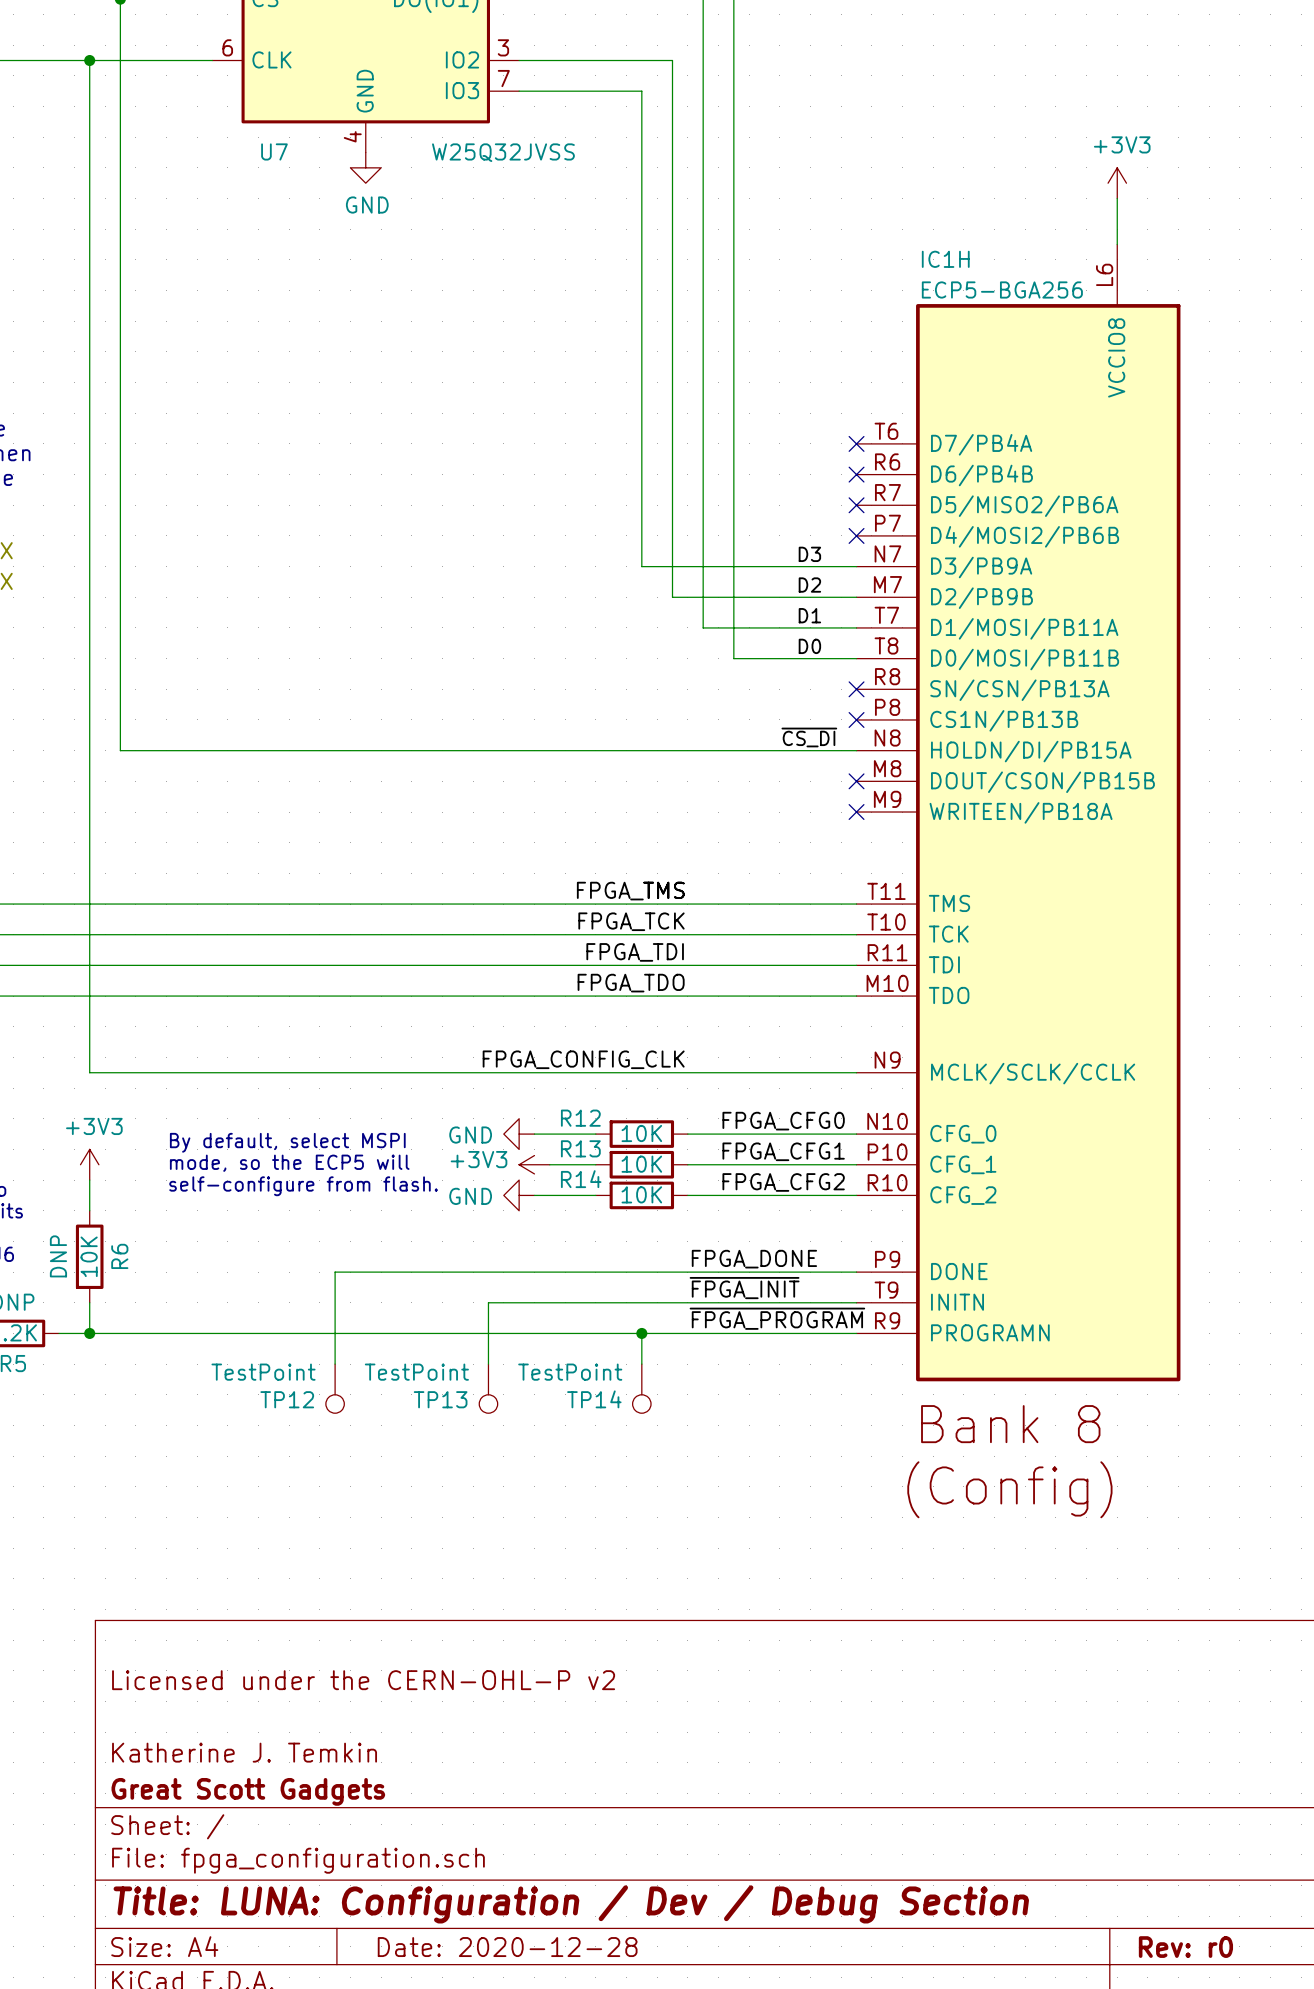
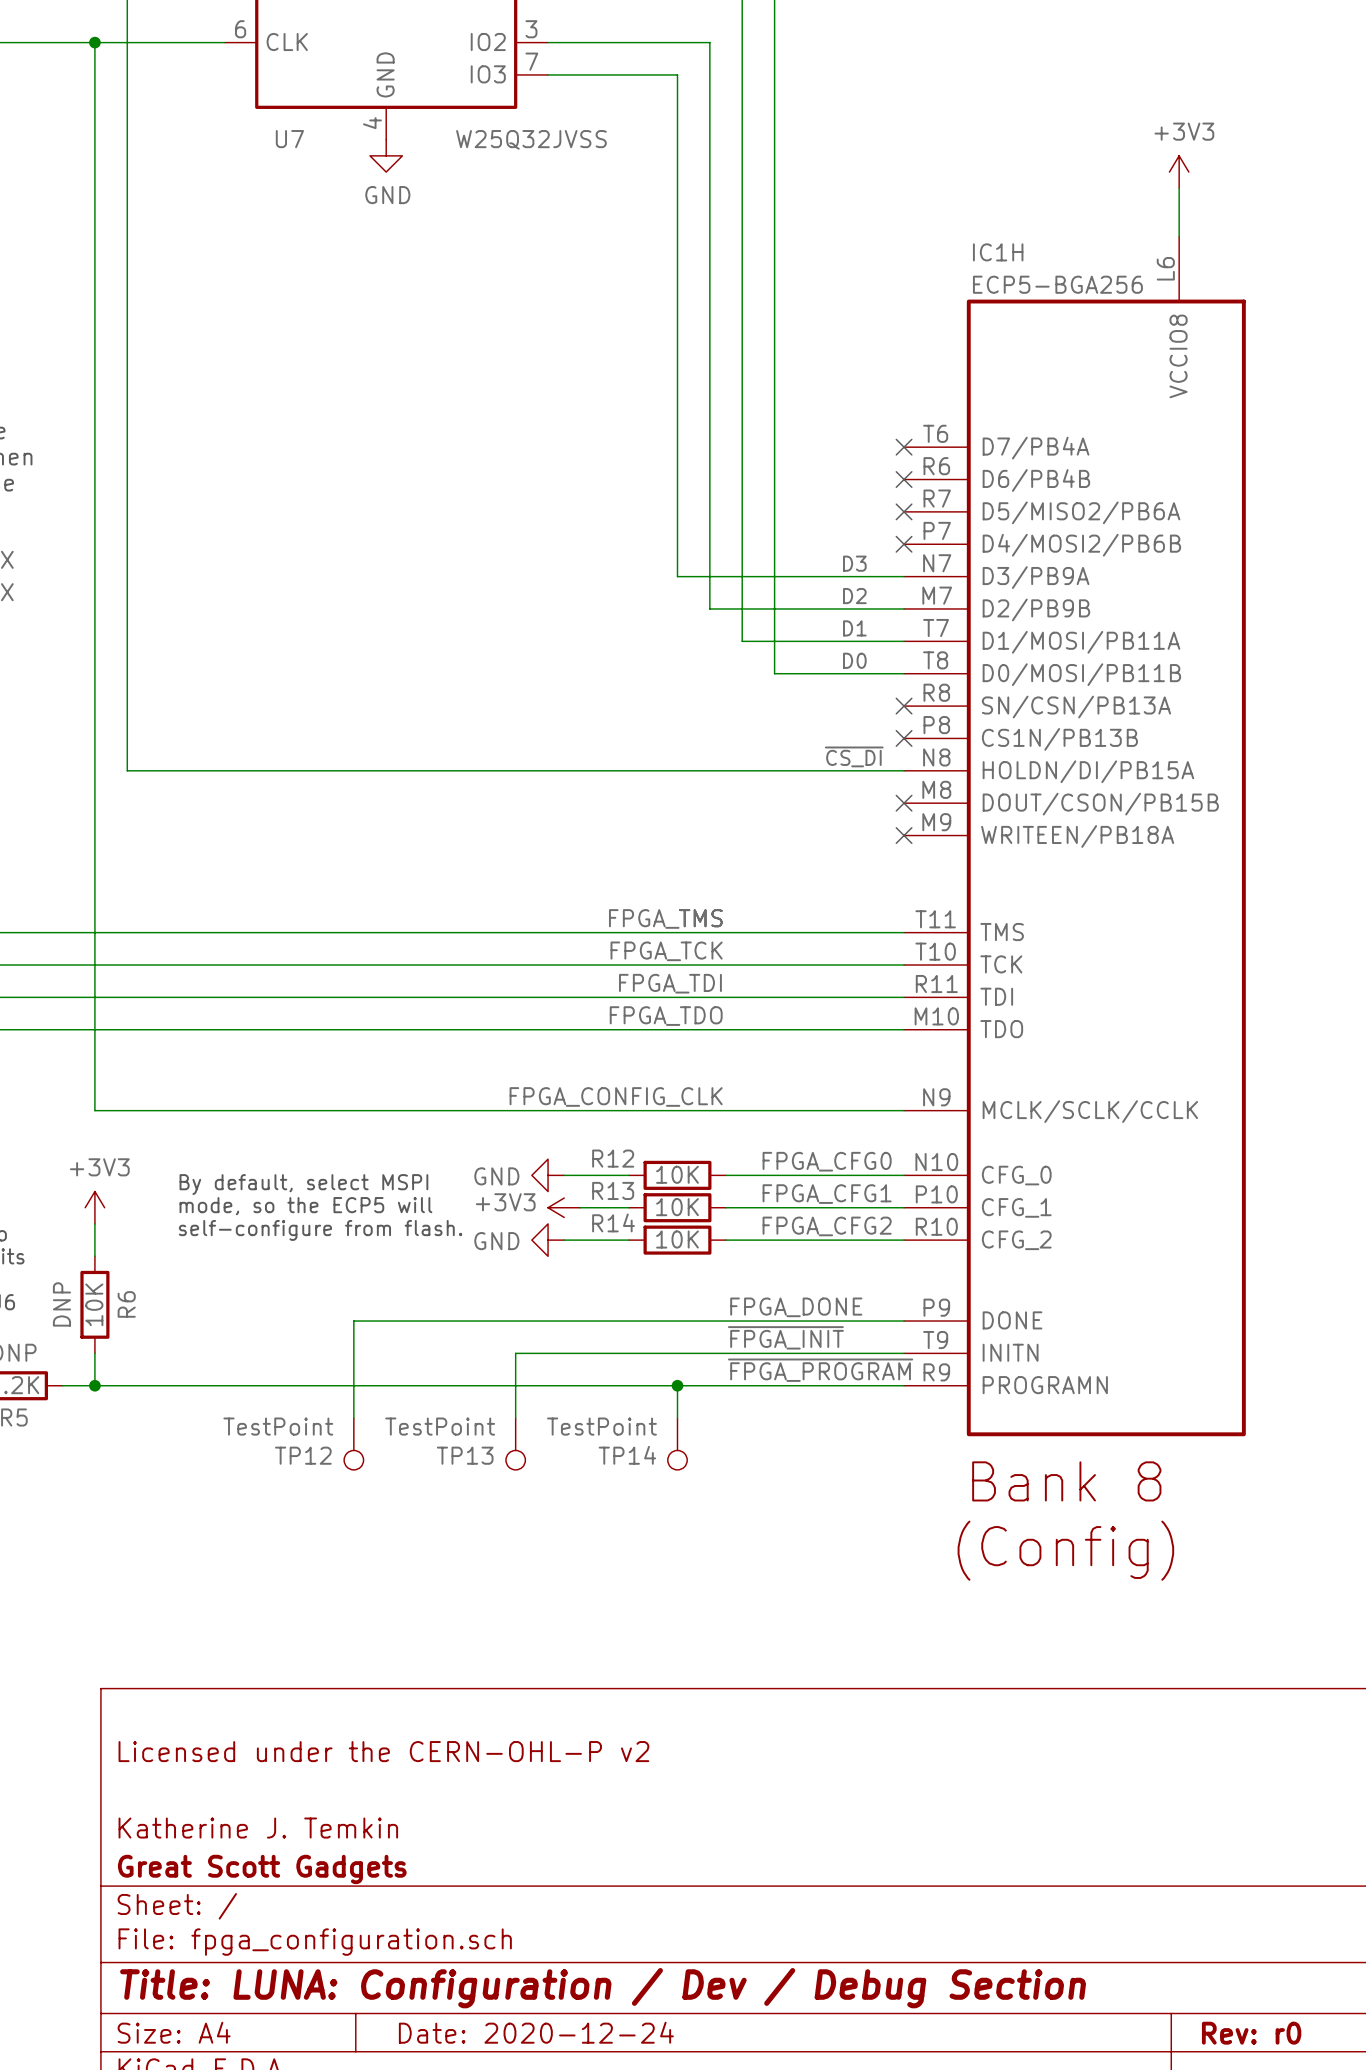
title block: Date: 2020-12-28 (507, 1947) -> Date: 2020-12-24 (536, 2032)

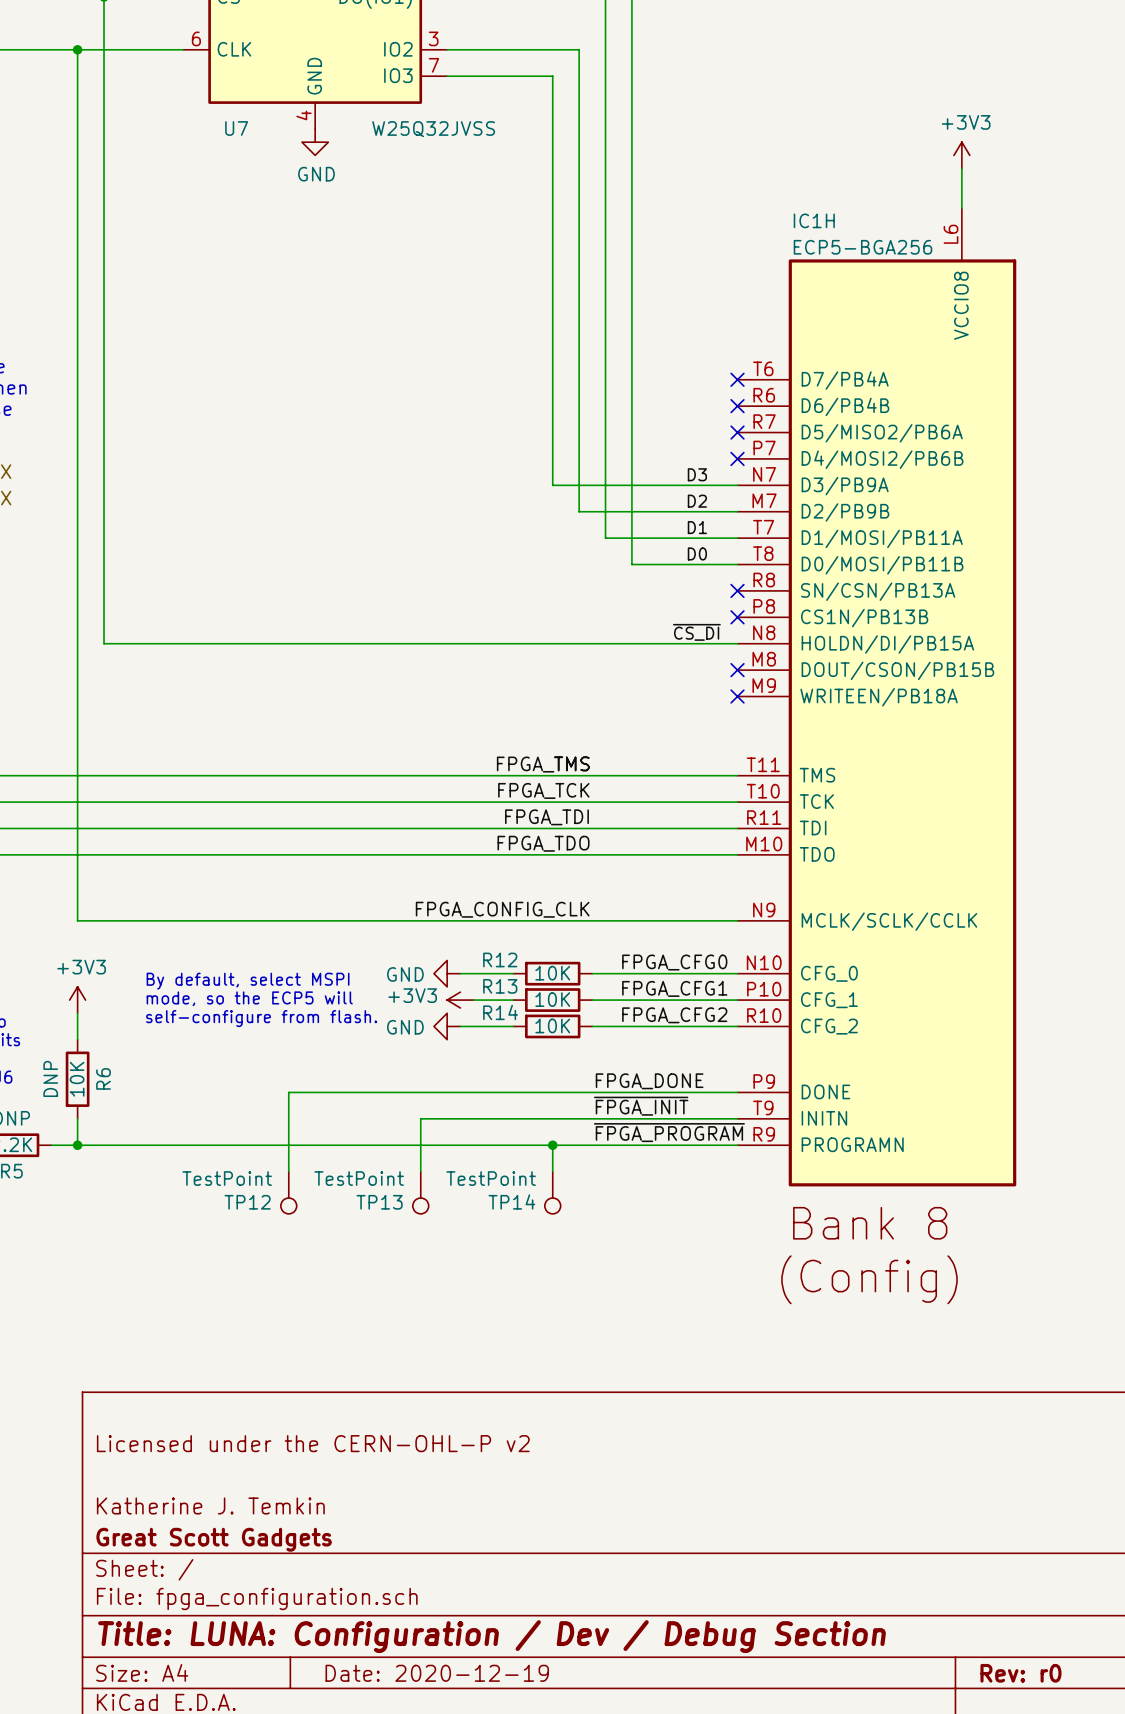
title block: Date: 2020-12-24 (536, 2032) -> Date: 2020-12-19 (437, 1673)

